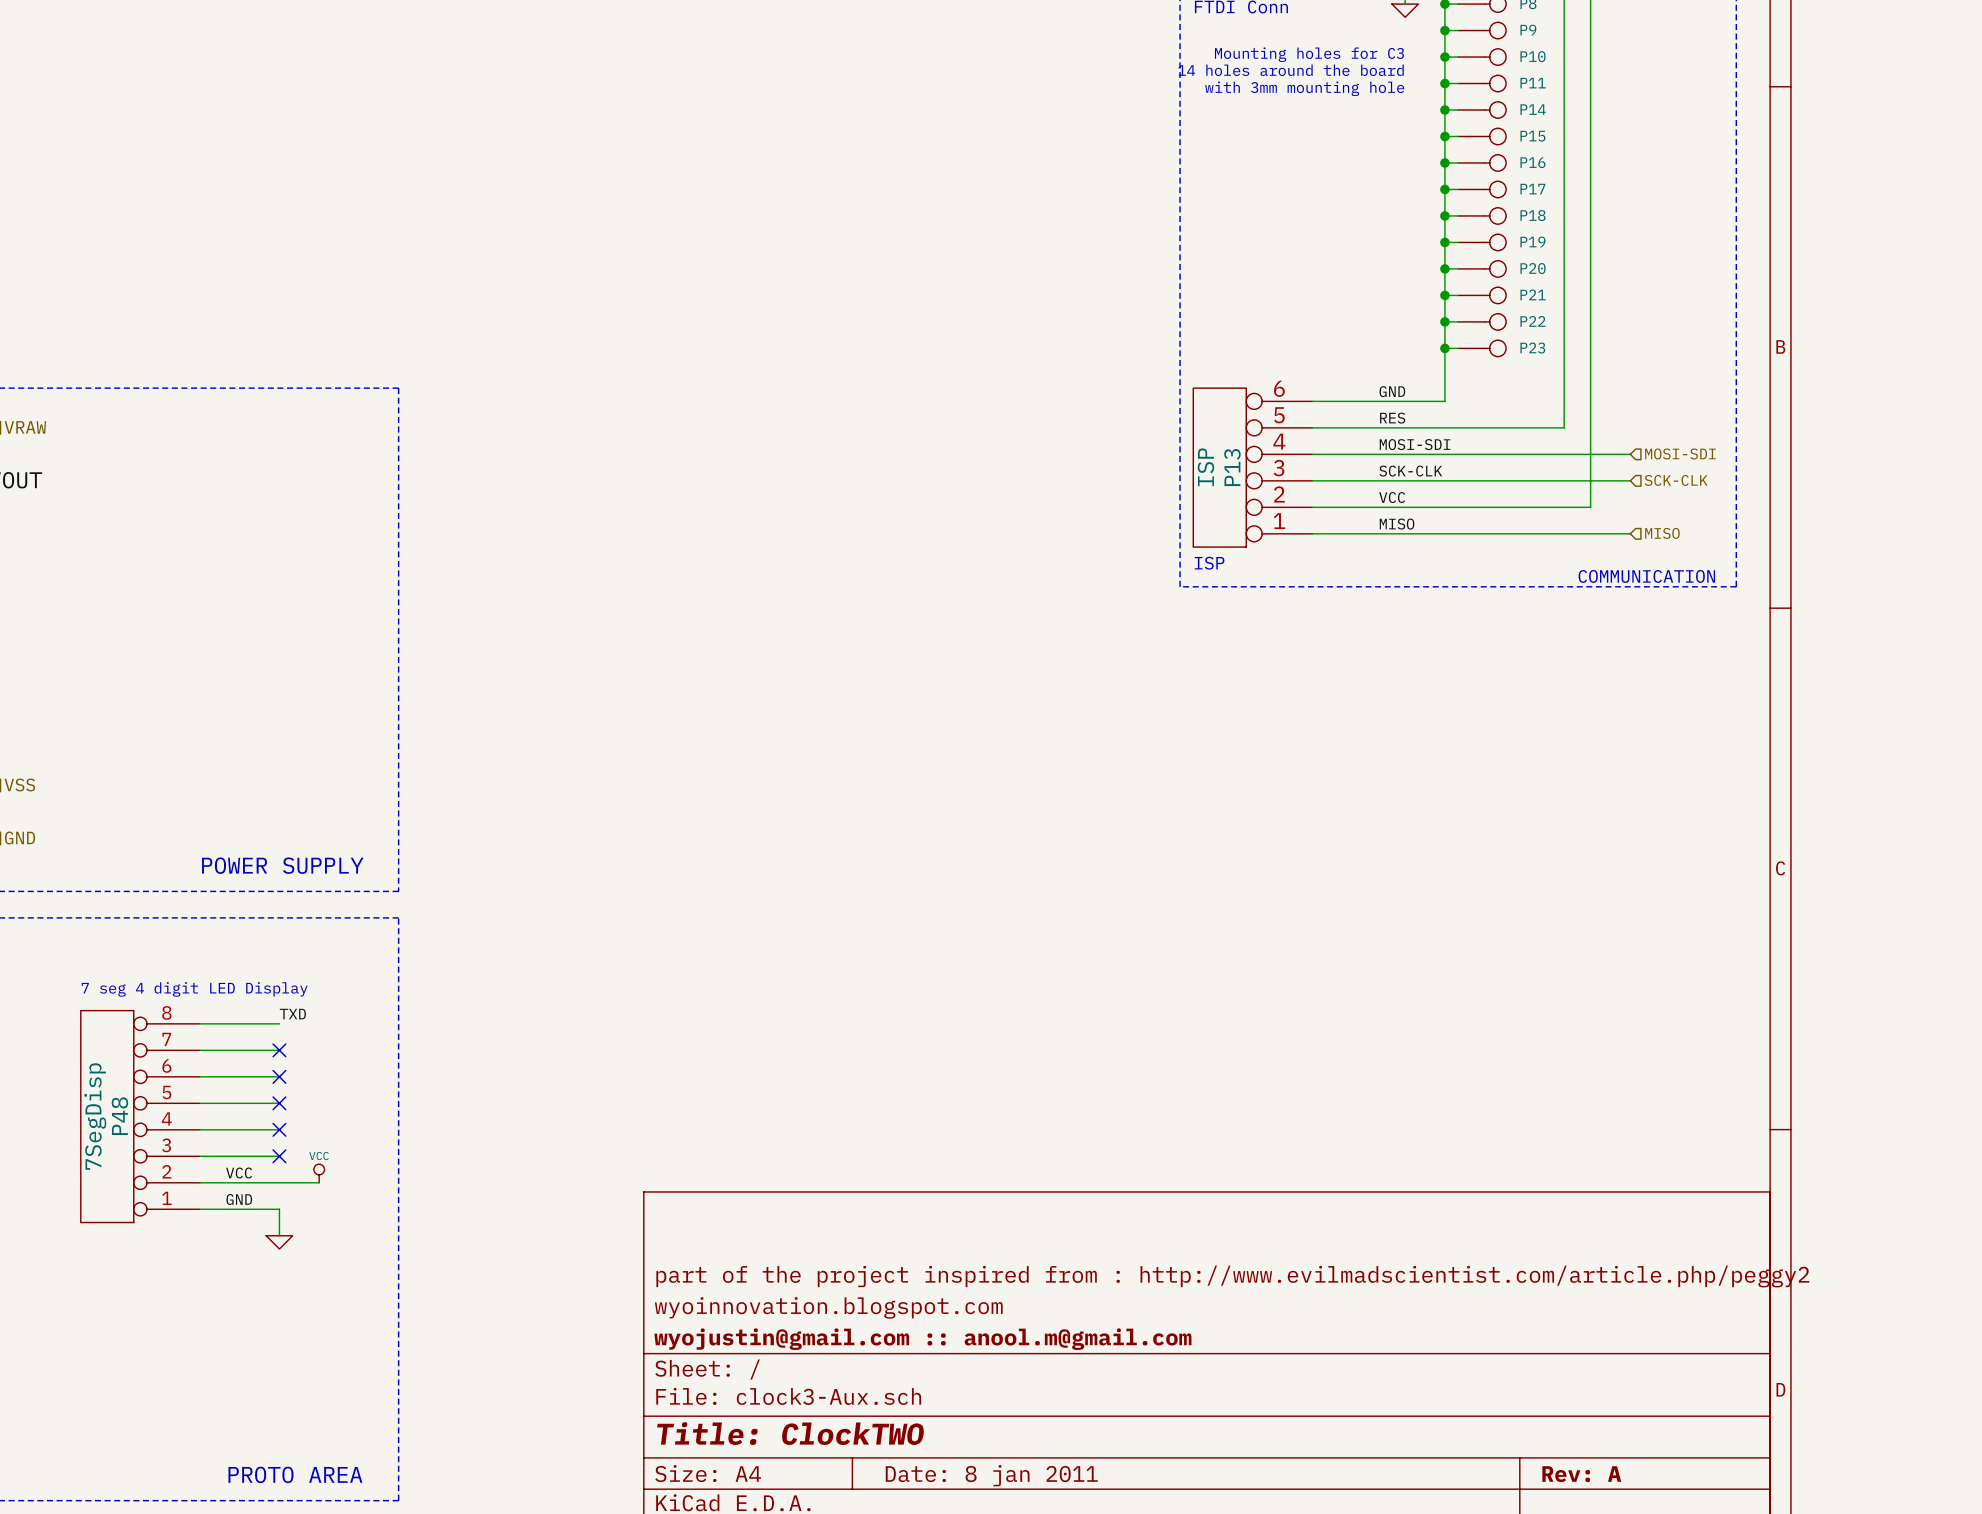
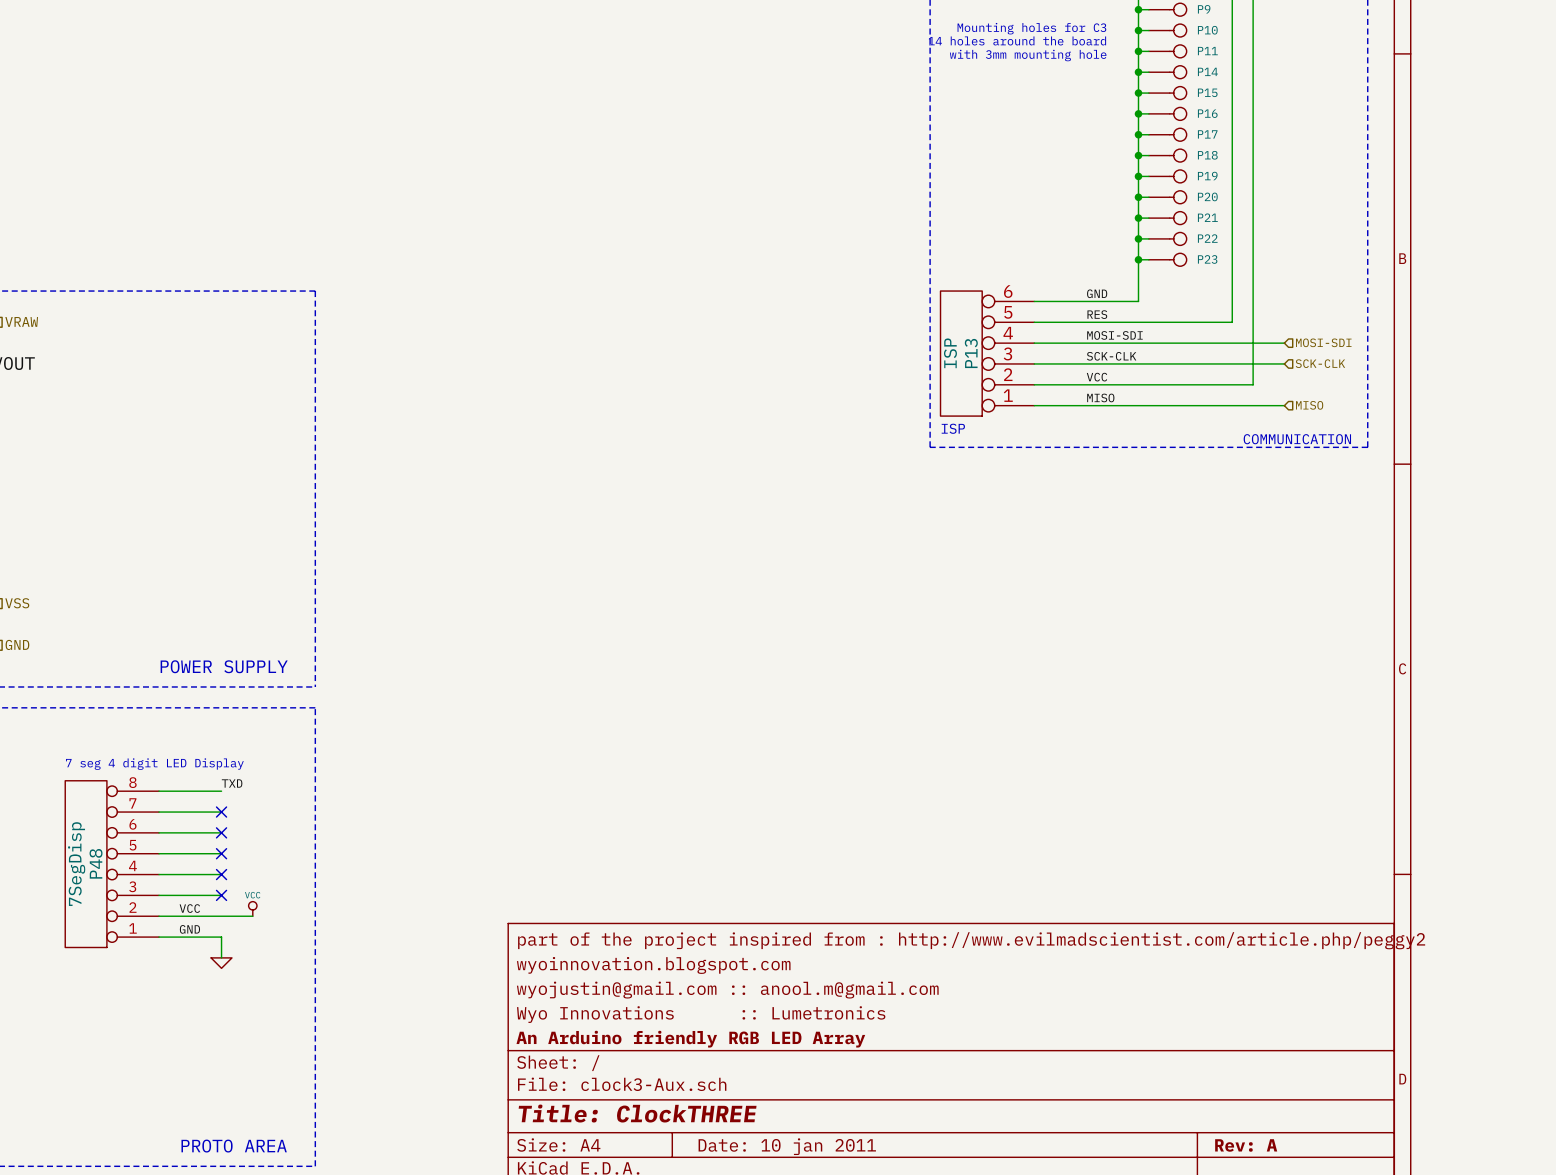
title block: none -> part of the project inspired from : http://www.evilmadscientist.com/article.php/peggy2 (971, 940)
title block: none -> wyoinnovation.blogspot.com (653, 965)
title block: part of the project inspired from : http://www.evilmadscientist.com/article.php/peggy2 (1232, 1276) -> wyojustin@gmail.com :: anool.m@gmail.com (727, 990)
title block: wyoinnovation.blogspot.com (828, 1307) -> Wyo Innovations :: Lumetronics (701, 1014)
title block: wyojustin@gmail.com :: anool.m@gmail.com (922, 1339) -> An Arduino friendly RGB LED Array (690, 1039)
title block: Title: ClockTWO (790, 1433) -> Title: ClockTHREE (637, 1113)
title block: Date: 8 jan 2011 (991, 1475) -> Date: 10 jan 2011 (787, 1146)

